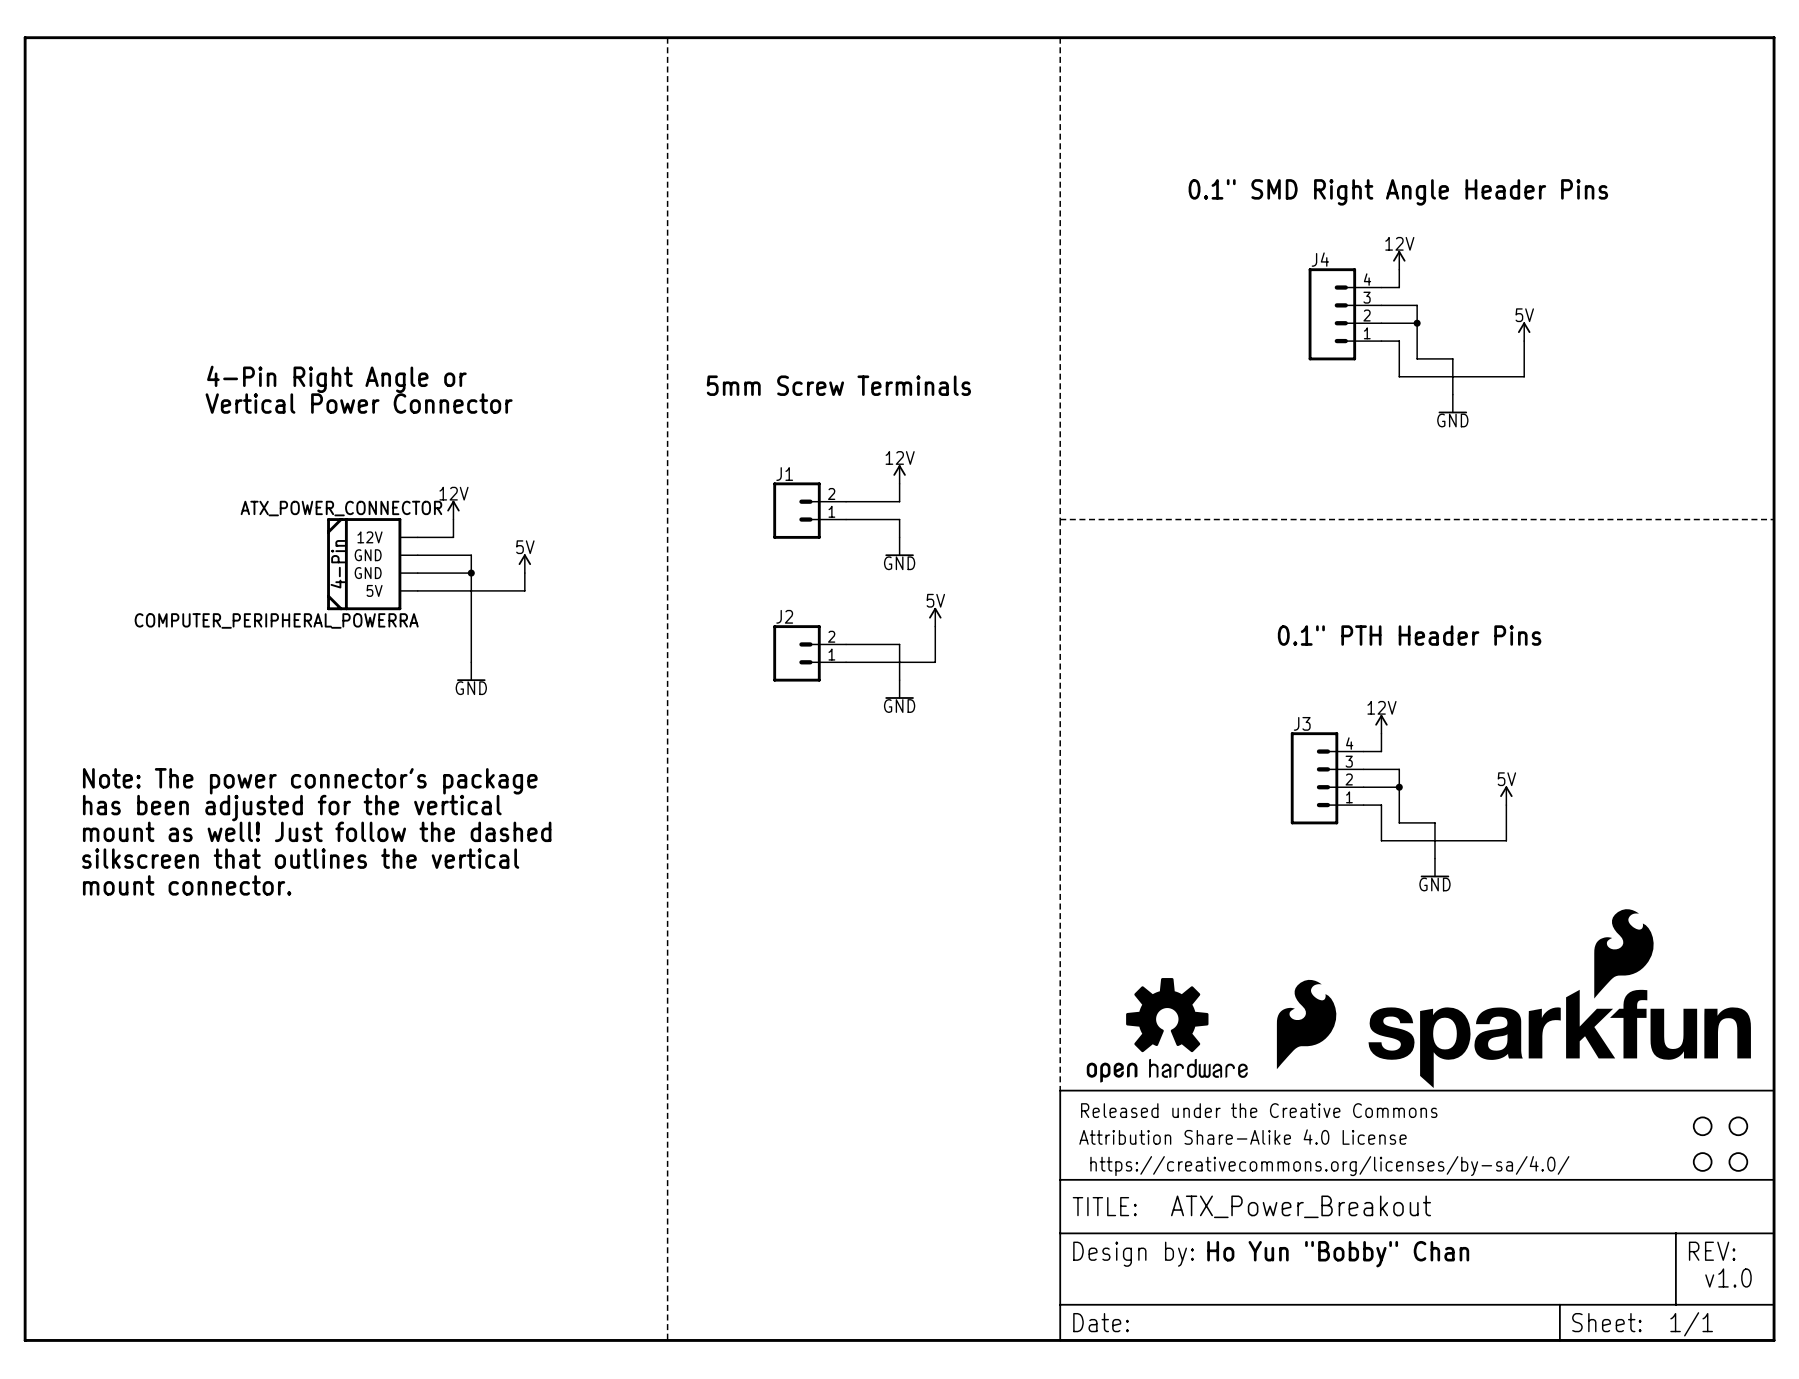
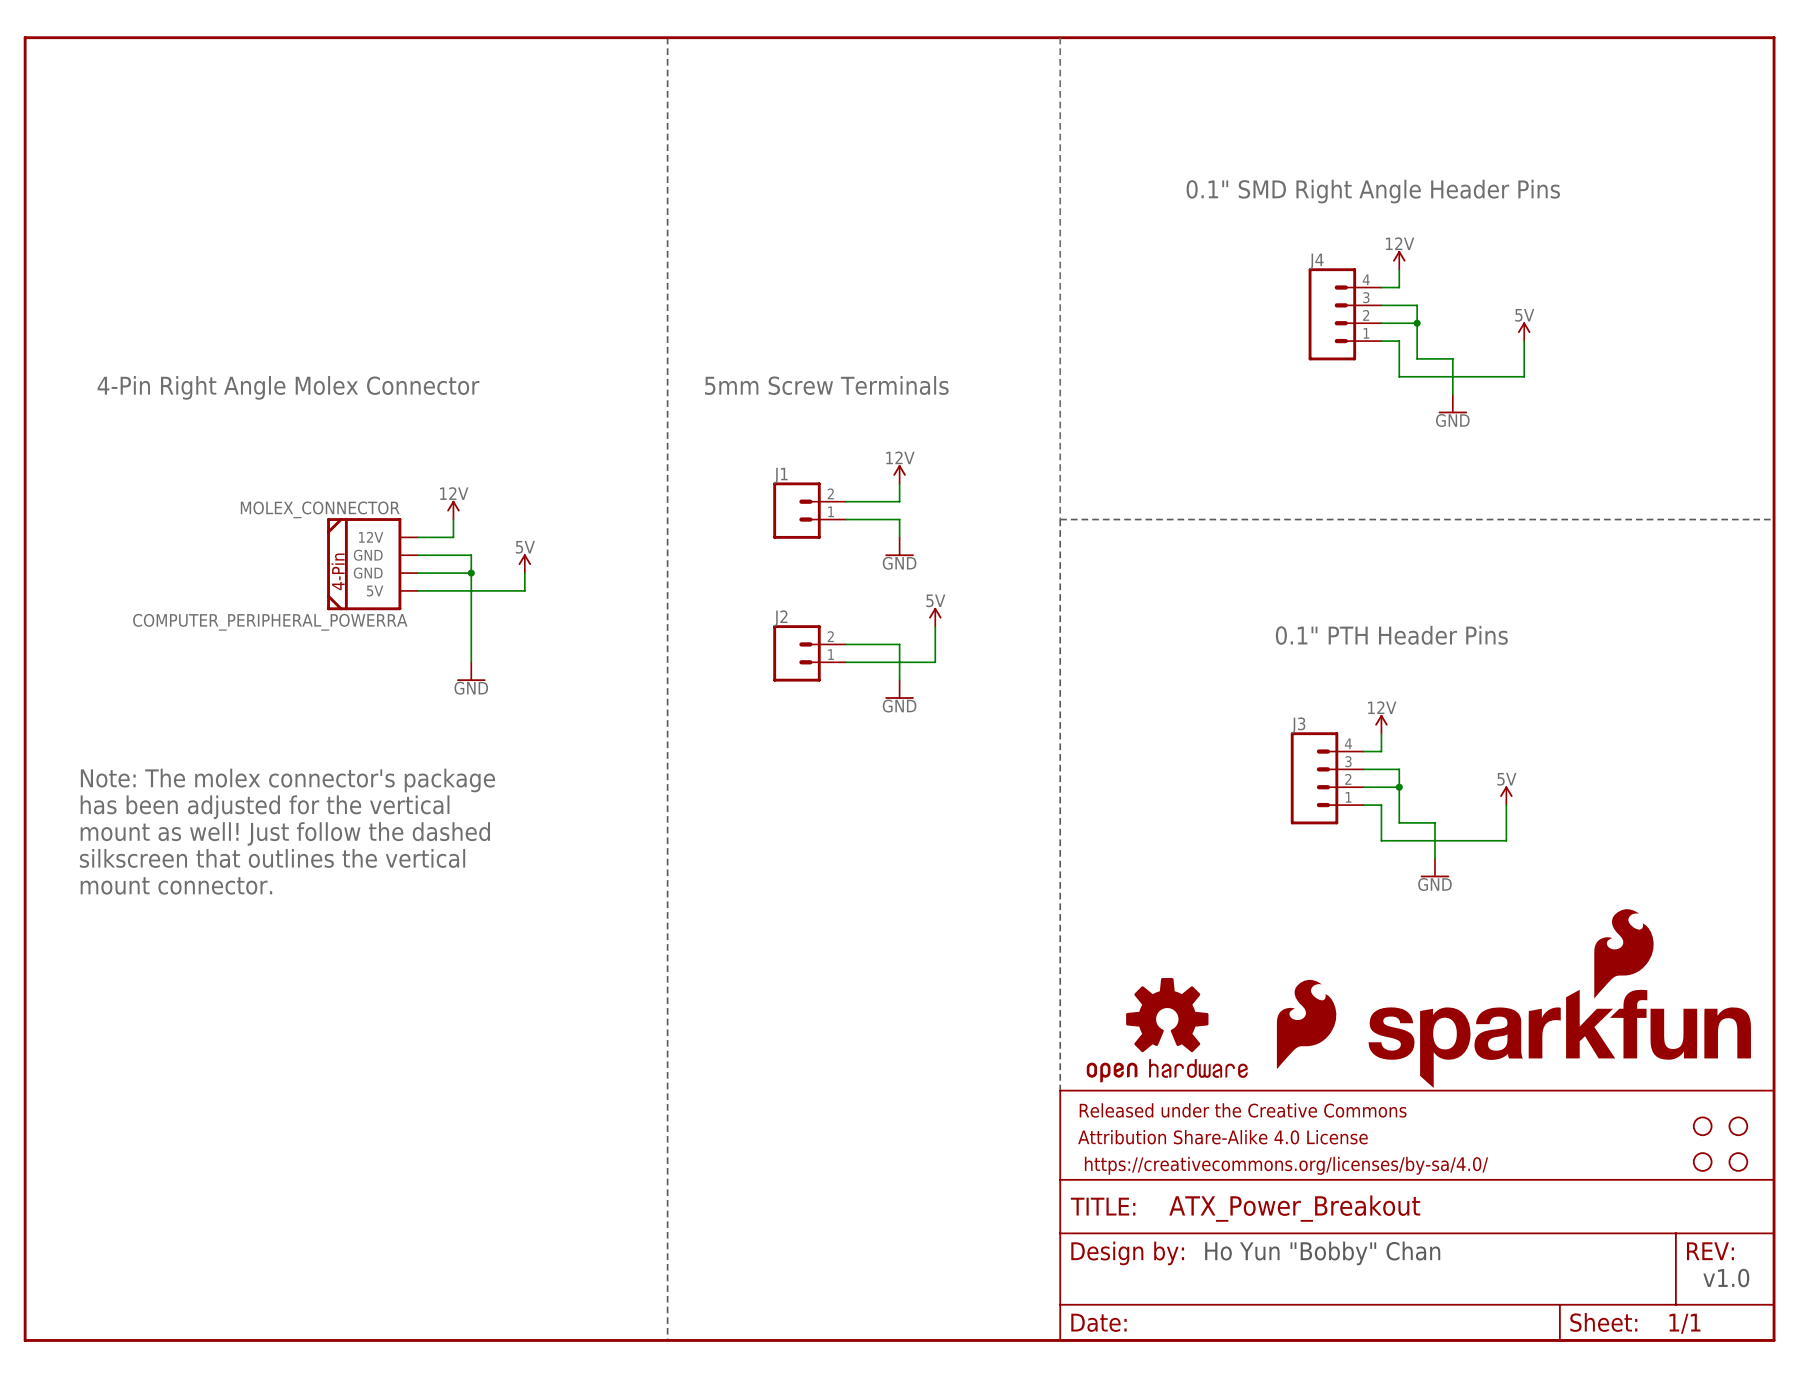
text: 4-Pin Right Angle or (336, 379) -> 4-Pin Right Angle Molex Connector (288, 387)
text: Vertical Power Connector (359, 403) -> none
ATX_POWER_CONNECTOR name: ATX_POWER_CONNECTOR (341, 508) -> MOLEX_CONNECTOR (320, 509)
text: Note: The power connector's package (310, 781) -> Note: The molex connector's package (287, 780)

